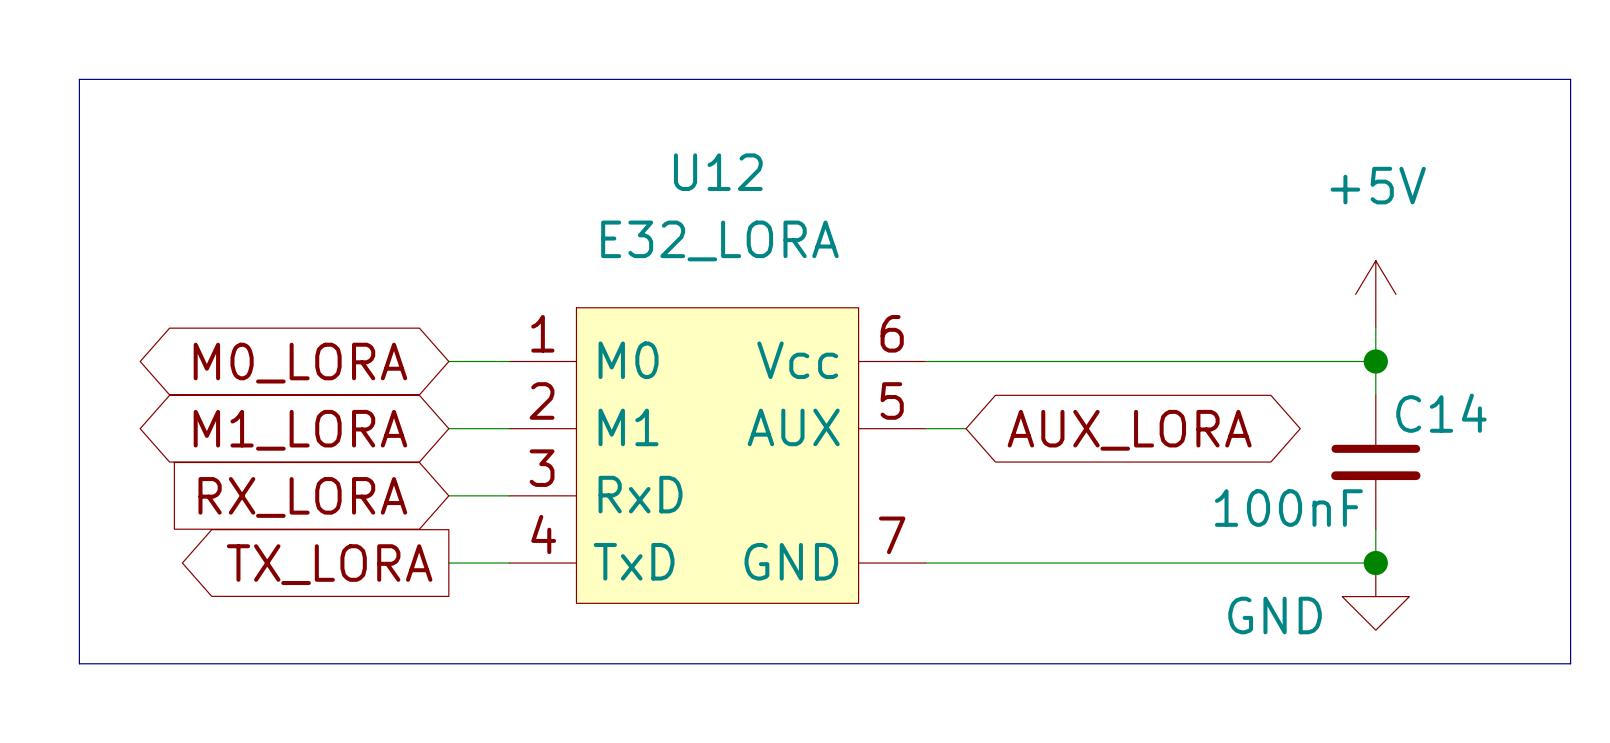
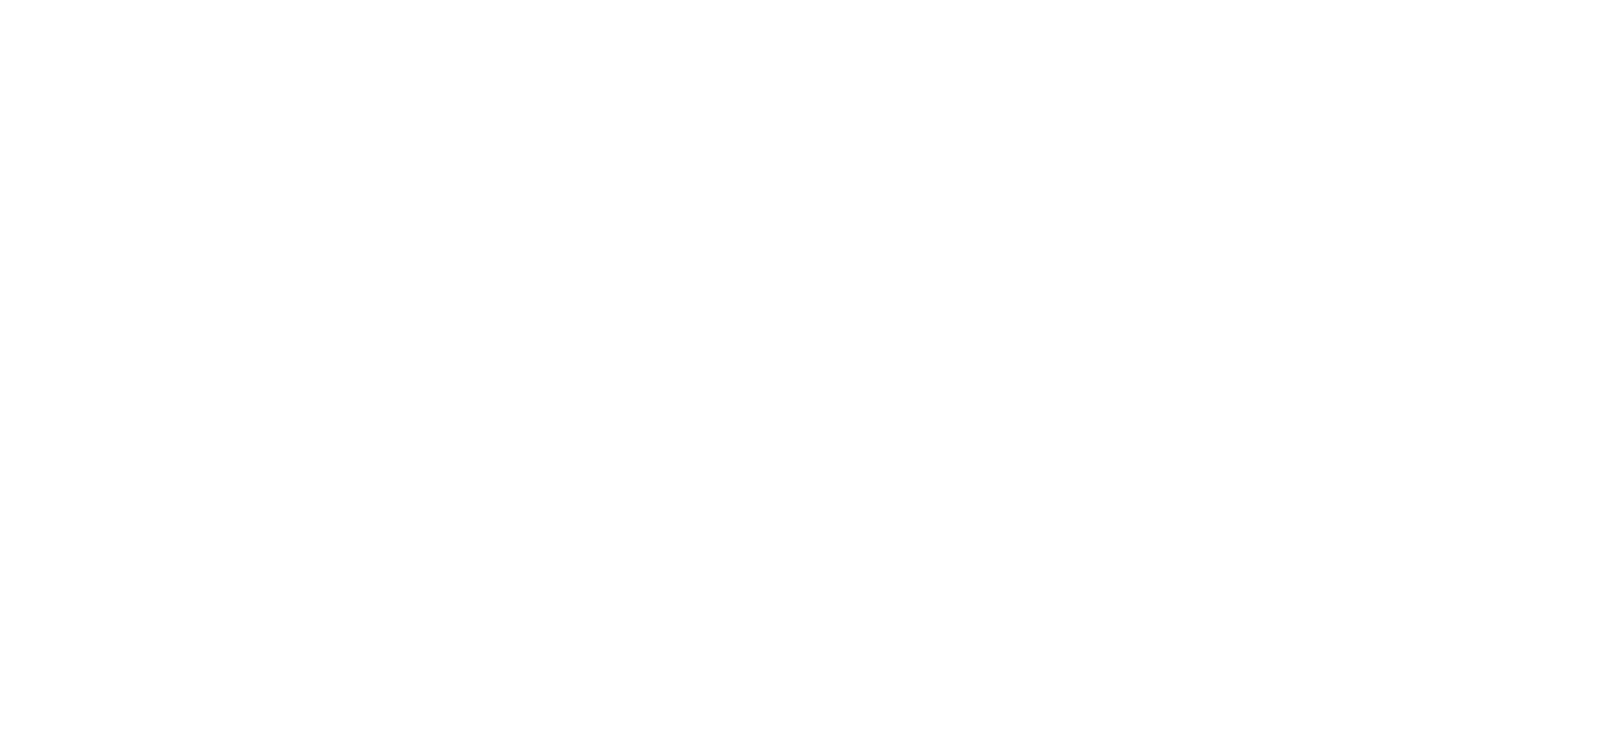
line: (79, 79) (79, 663) (1570, 663) (1570, 79) (79, 79) -> none
power symbol: +5V (1375, 294) -> none
wire: (1375, 327) (1375, 395) -> none
wire: (448, 361) (509, 361) -> none
wire: (925, 361) (1375, 361) -> none
junction: (1375, 361) -> none
global label: M0_LORA (300, 363) -> none
wire: (448, 428) (509, 428) -> none
wire: (925, 428) (966, 428) -> none
global label: M1_LORA (300, 430) -> none
global label: AUX_LORA (1129, 430) -> none
U12: E32_LORA (717, 455) -> none
C14: 100nF (1375, 462) -> none
wire: (448, 495) (509, 495) -> none
global label: RX_LORA (302, 497) -> none
wire: (1375, 529) (1375, 563) (925, 563) -> none
wire: (448, 563) (509, 563) -> none
junction: (1375, 563) -> none
global label: TX_LORA (329, 564) -> none
power symbol: GND (1375, 596) -> none

